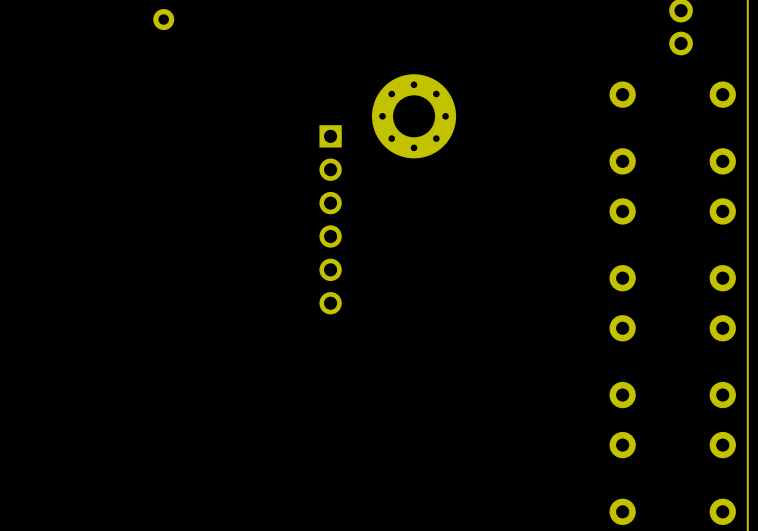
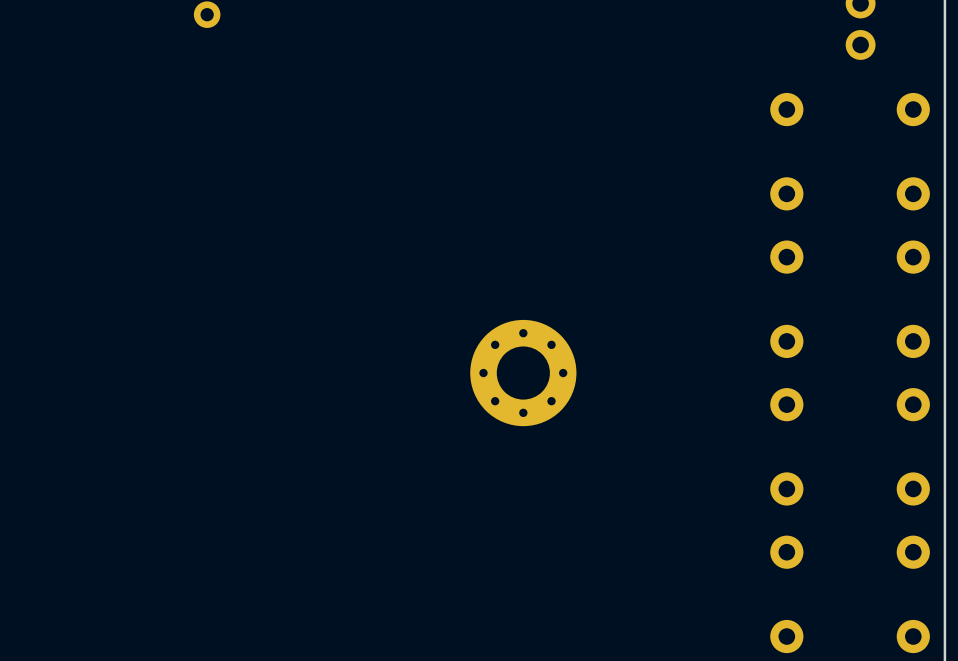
part position: (414, 116) -> (523, 373)
part: (330, 219) -> none

